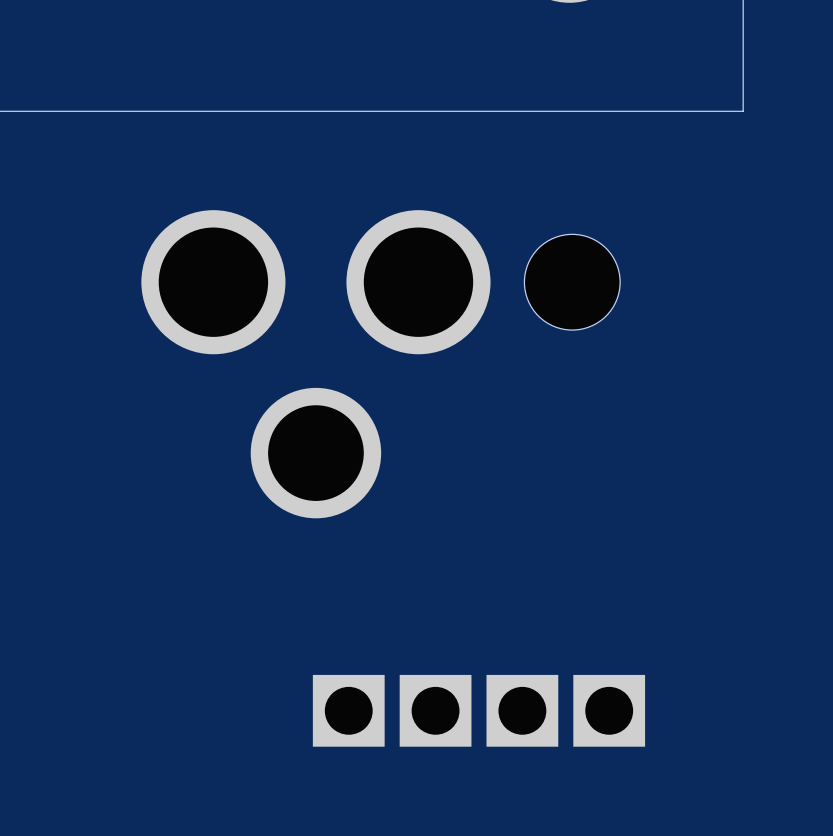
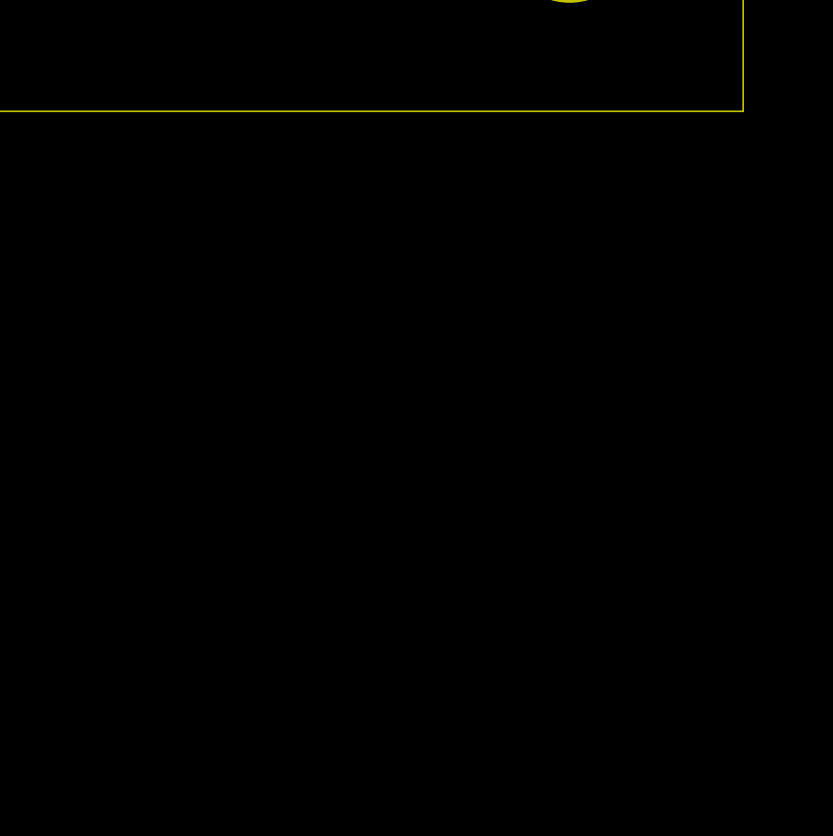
part: (380, 364) -> none
part: (478, 710) -> none

